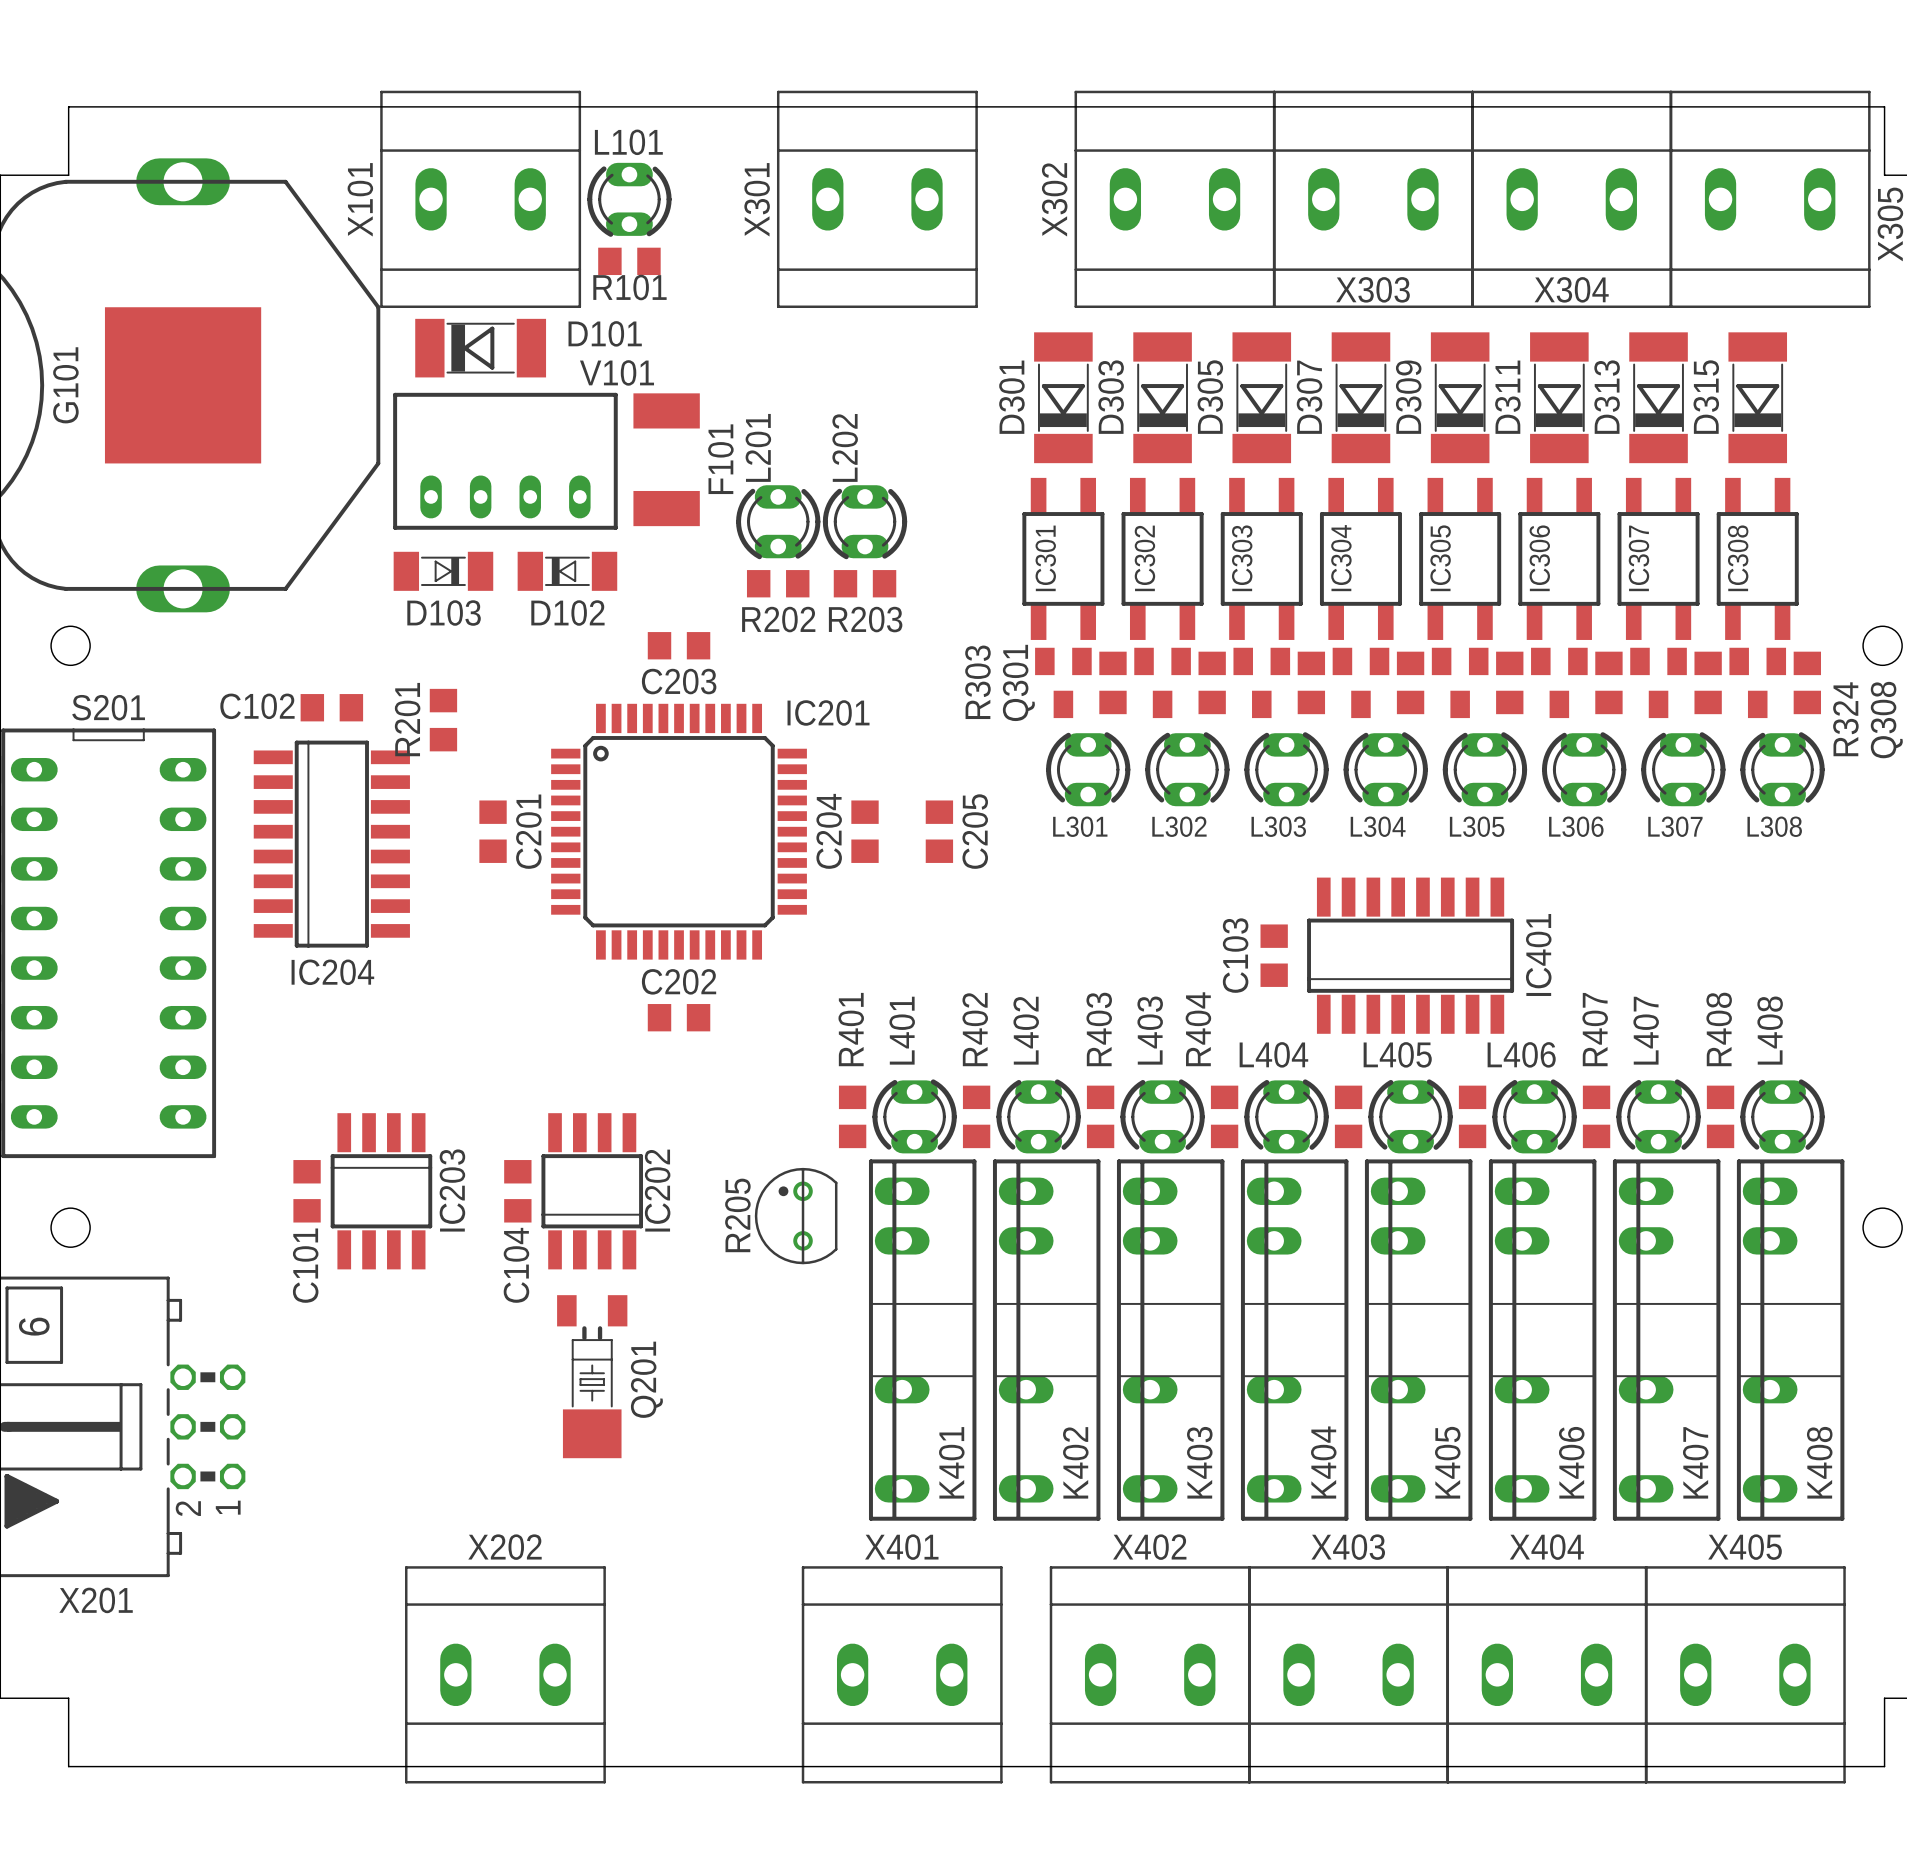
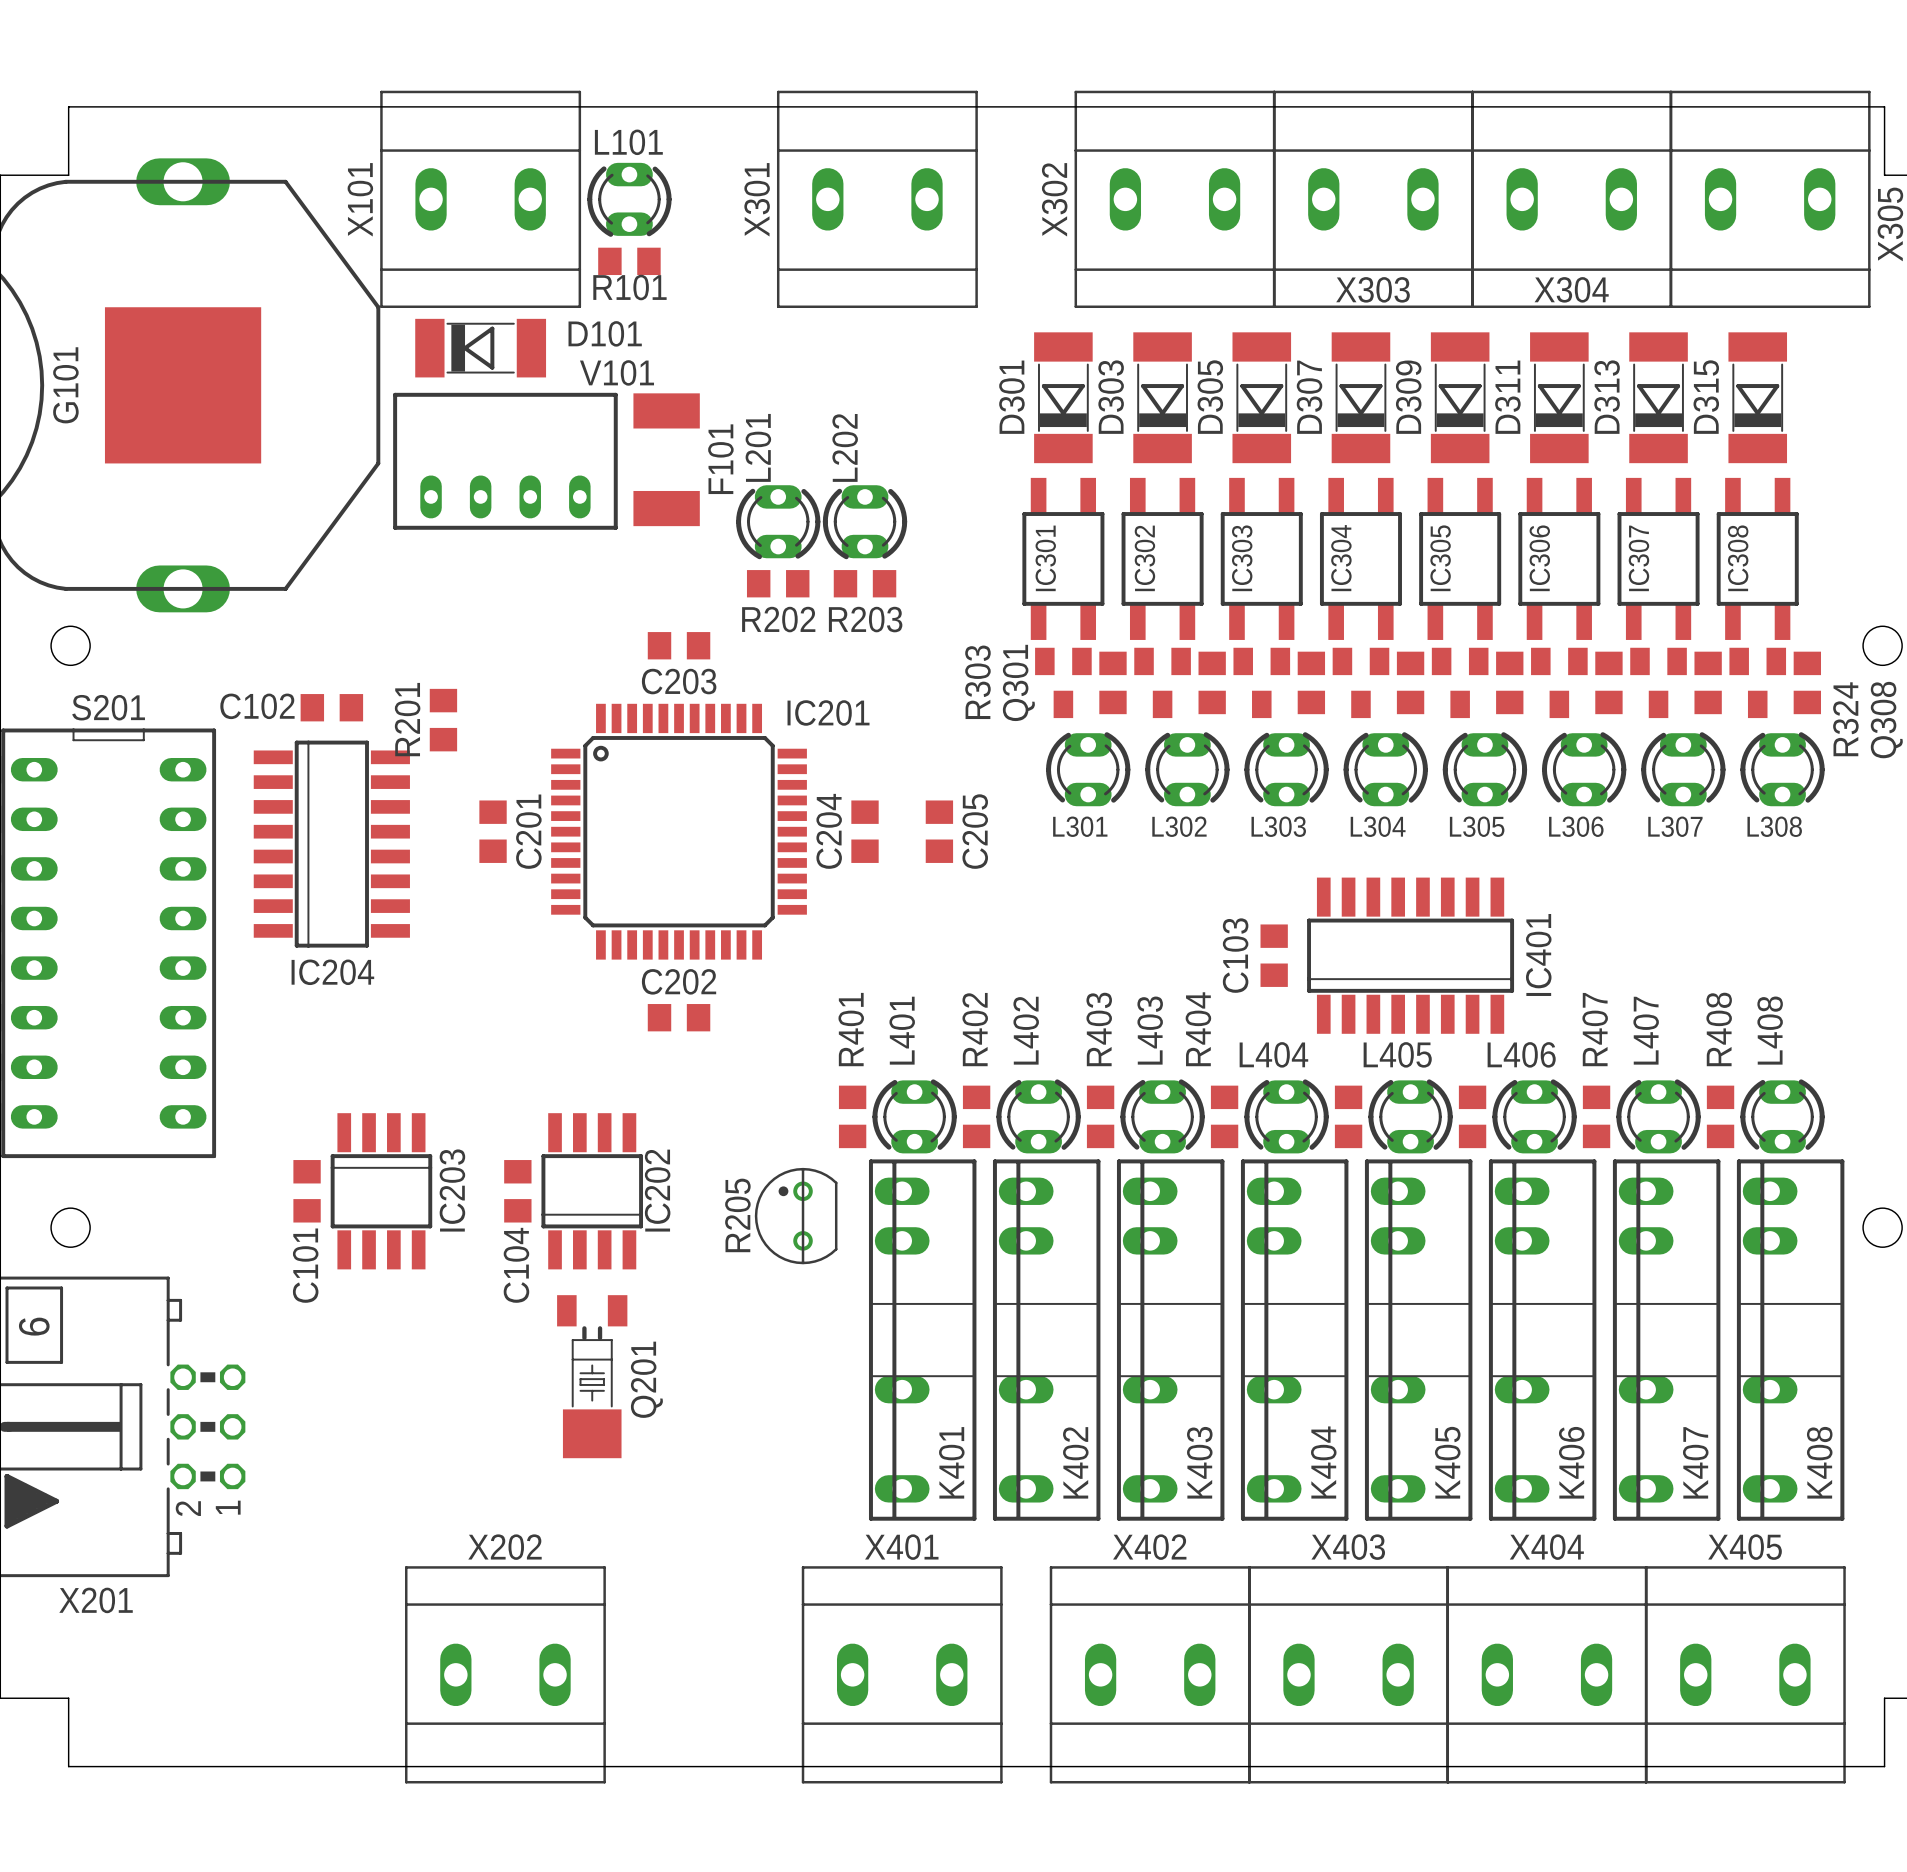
D103: (443, 571) -> none
D102: (567, 571) -> none

